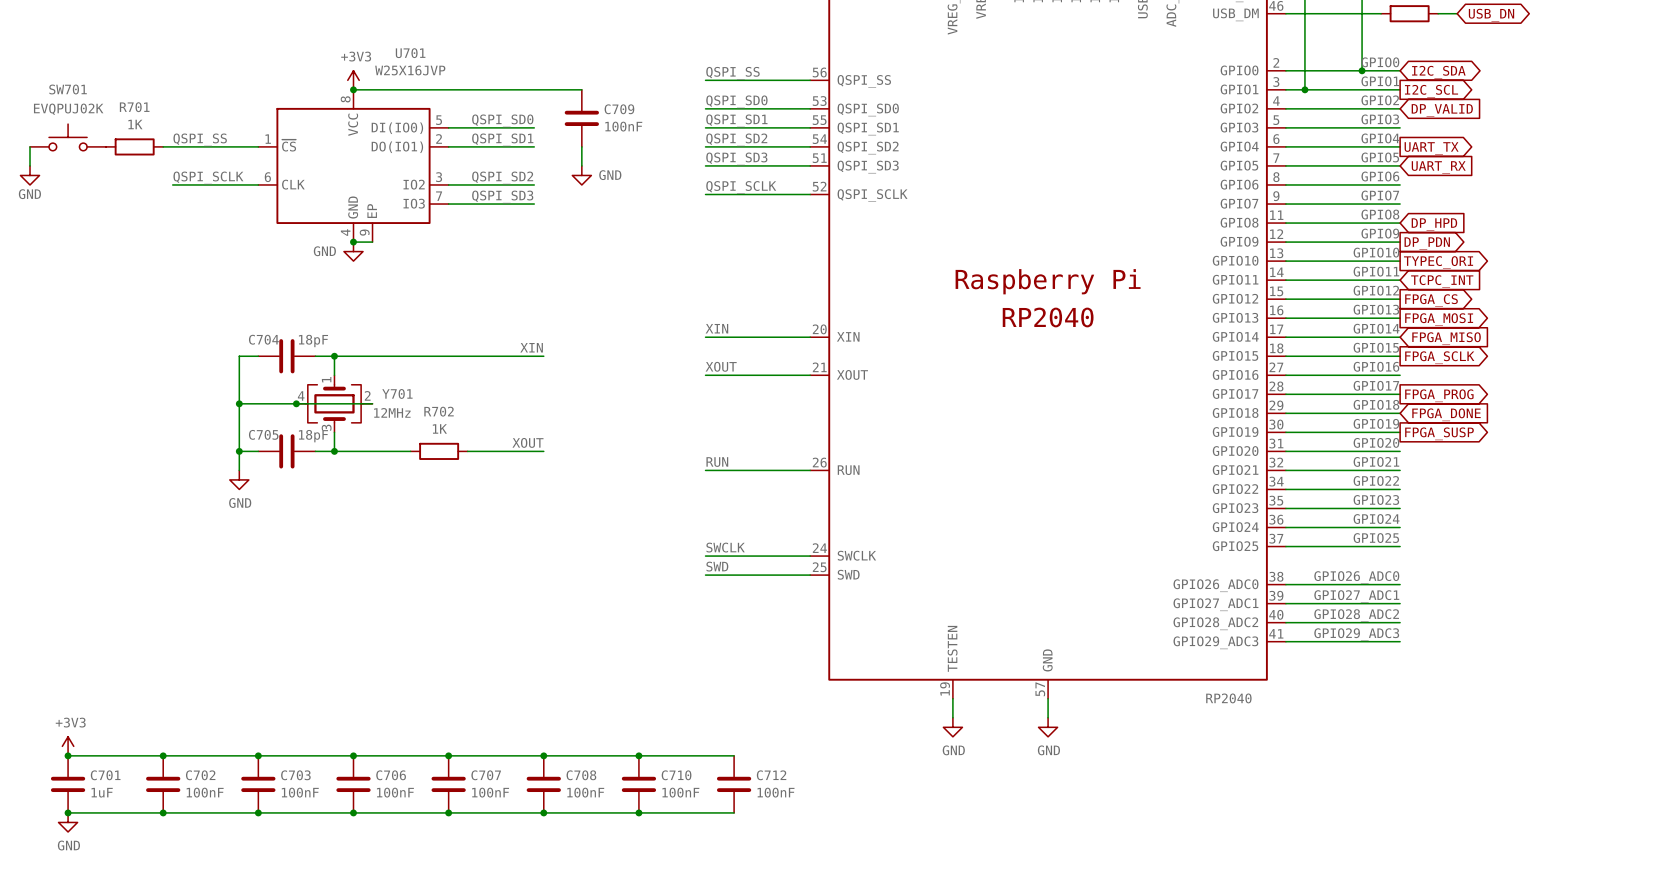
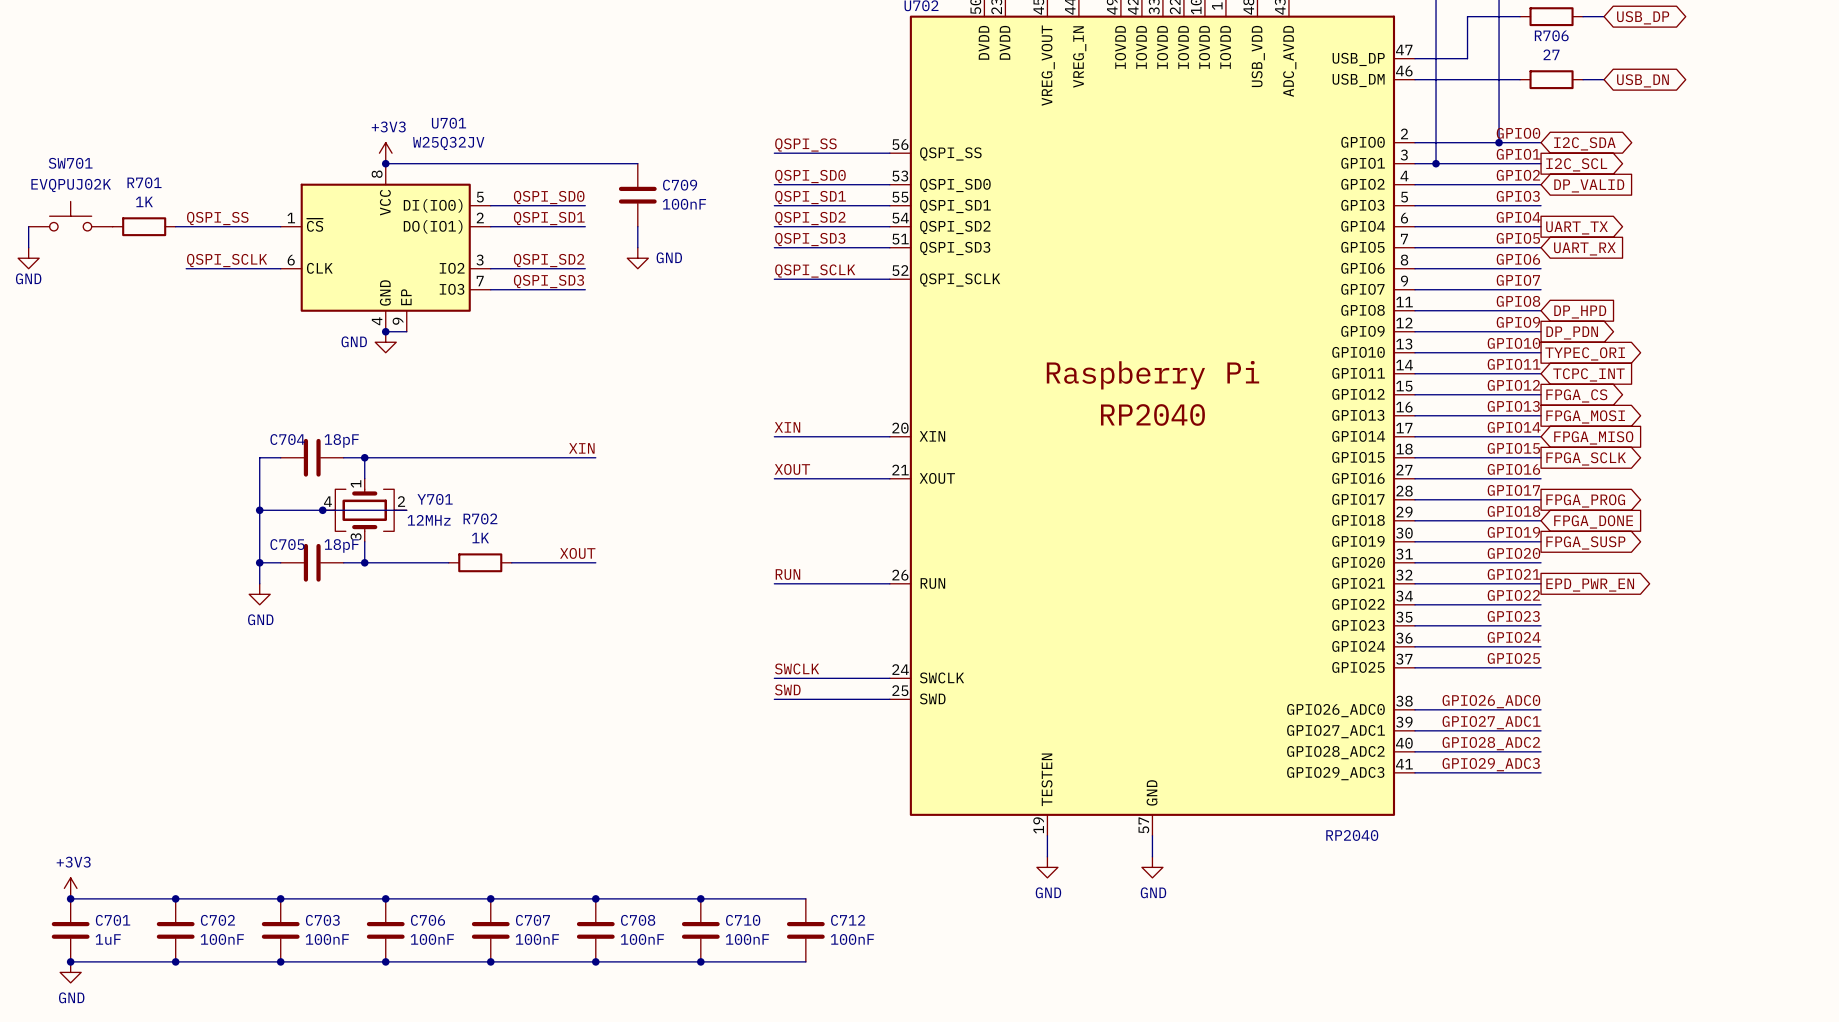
U701 value: W25X16JVP (410, 70) -> W25Q32JV (448, 143)
global label: none -> EPD_PWR_EN (1590, 585)

